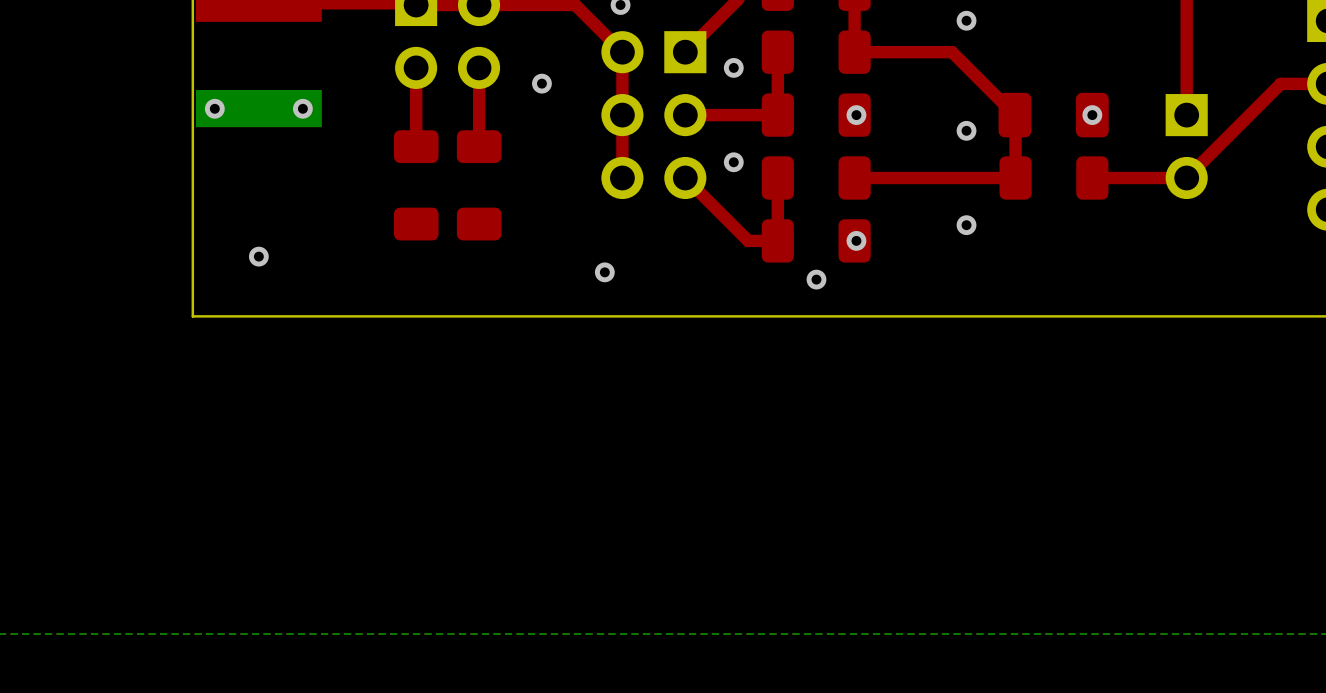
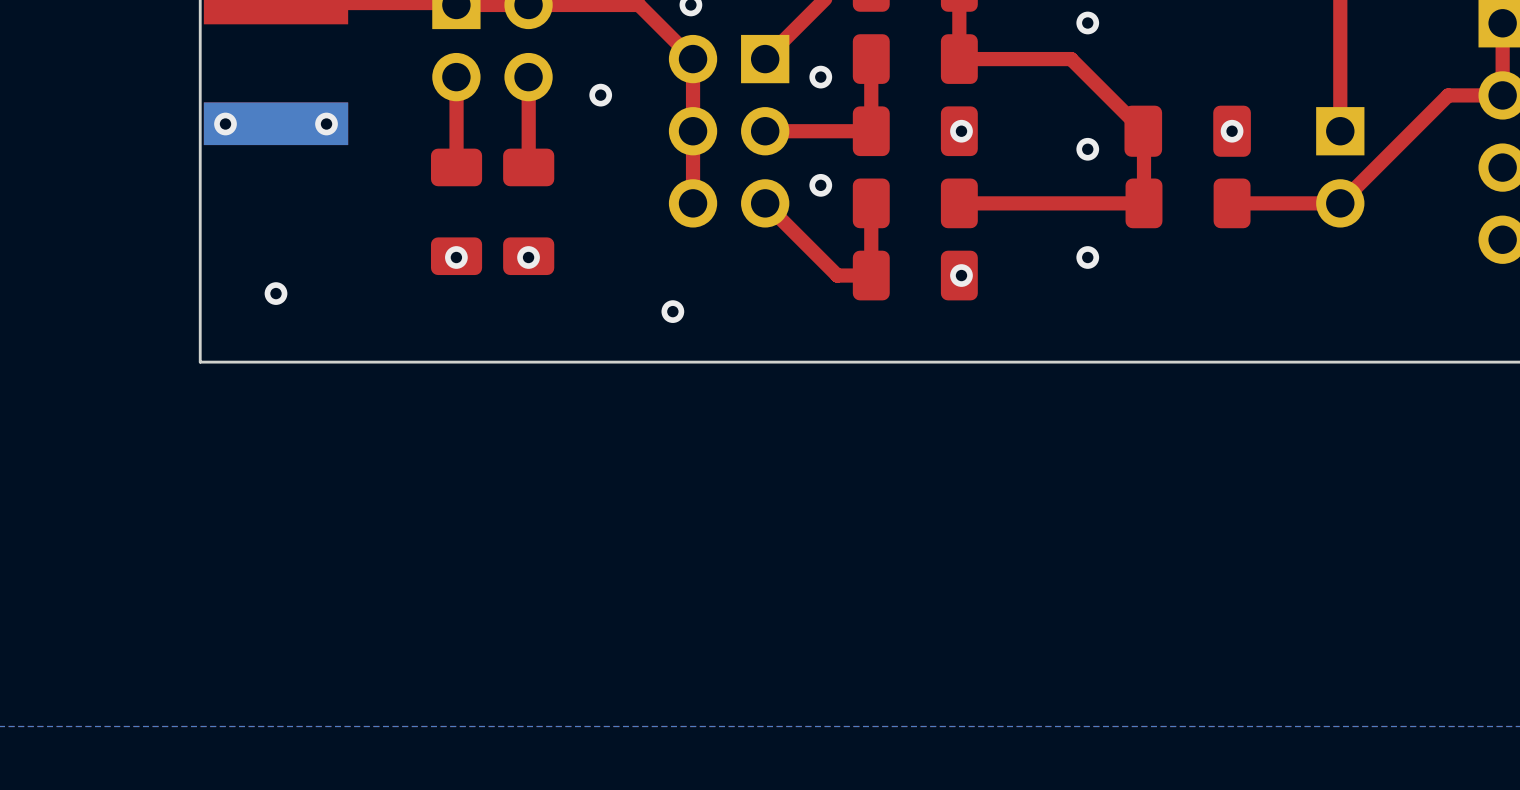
via: none -> (456, 257)
via: none -> (528, 257)
via: (816, 279) -> none

